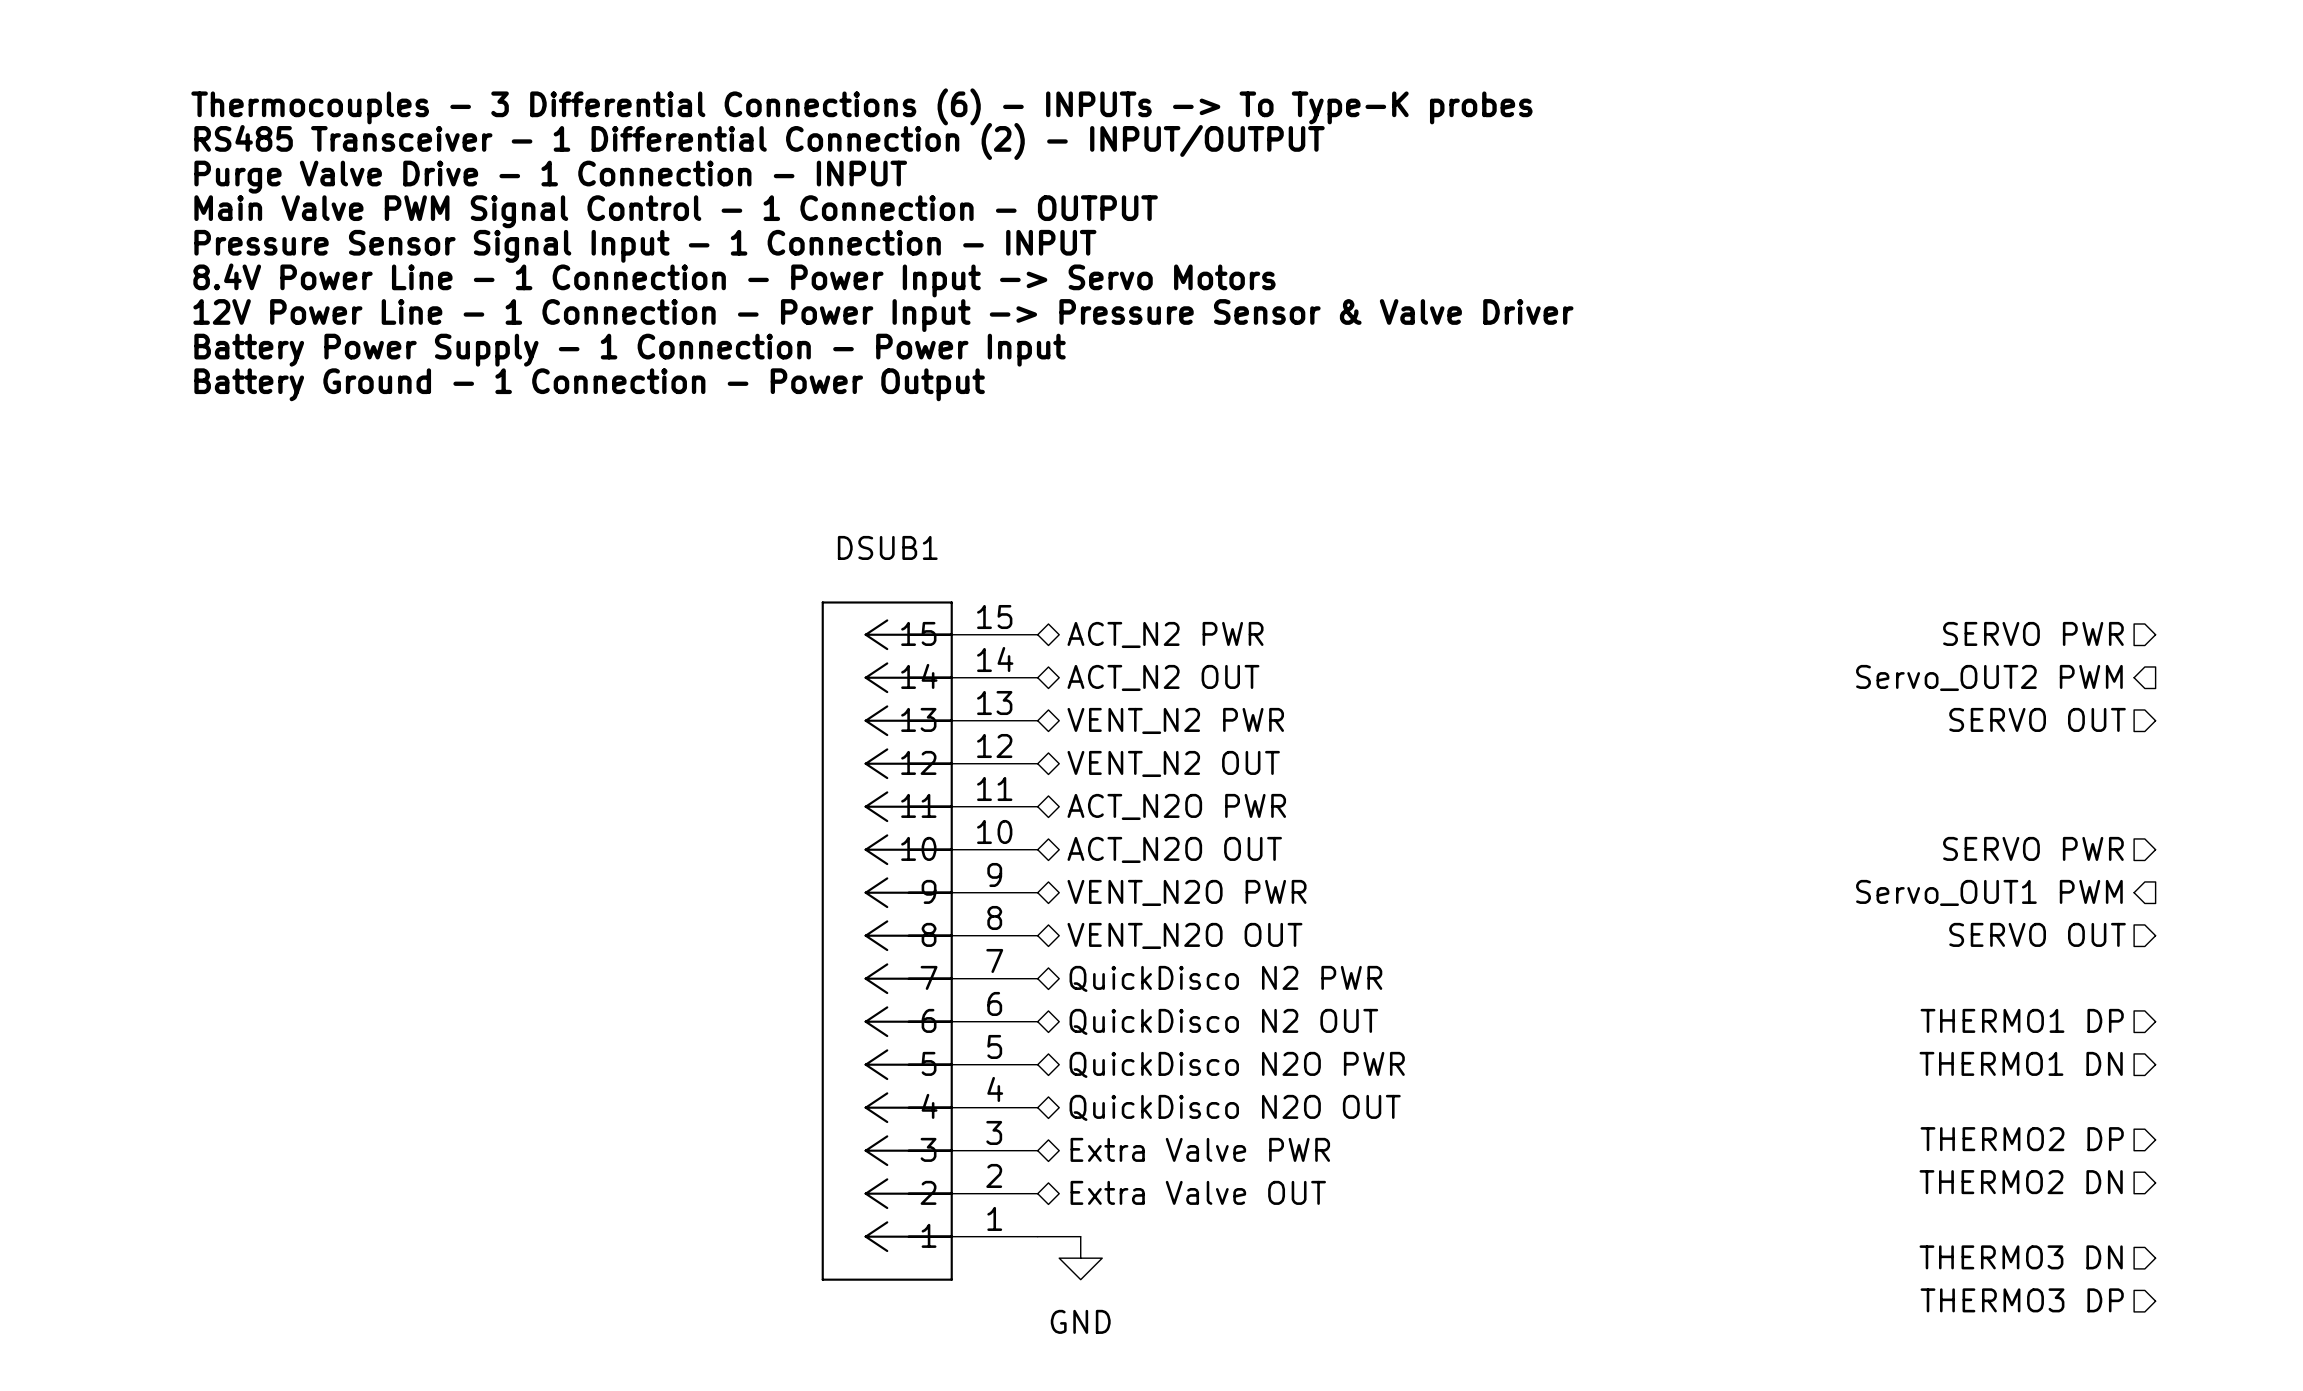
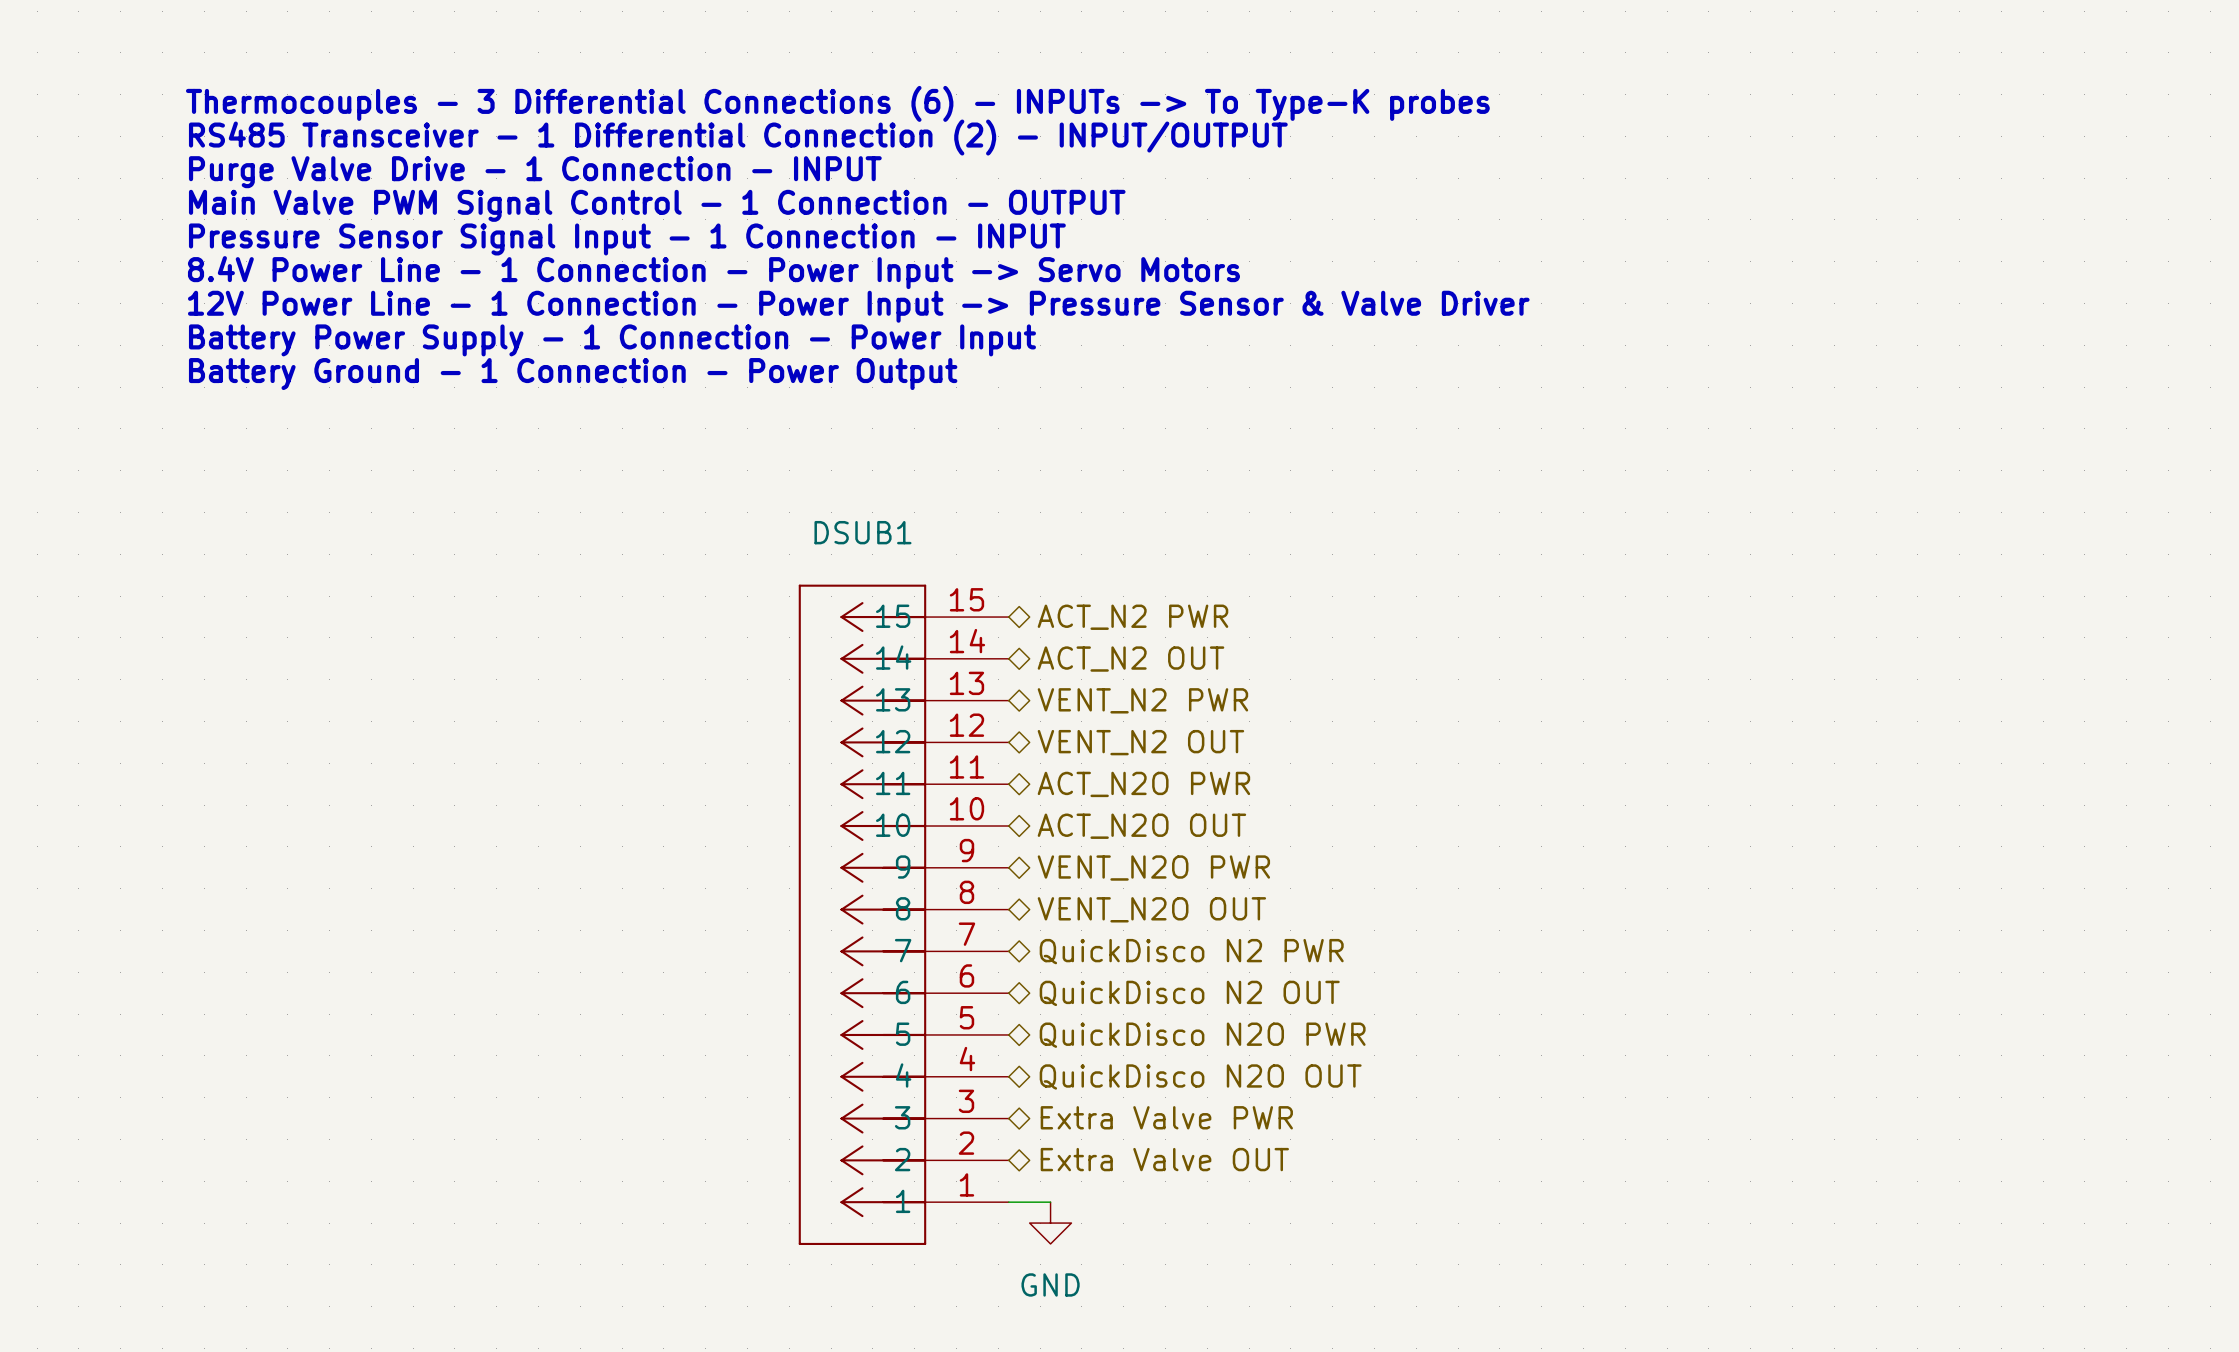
hierarchical label: SERVO PWR (2033, 633) -> none
hierarchical label: Servo_OUT2 PWM (1989, 677) -> none
hierarchical label: SERVO OUT (2037, 719) -> none
hierarchical label: SERVO PWR (2033, 848) -> none
hierarchical label: Servo_OUT1 PWM (1989, 892) -> none
hierarchical label: SERVO OUT (2037, 934) -> none
hierarchical label: THERMO1 DP (2022, 1020) -> none
hierarchical label: THERMO1 DN (2021, 1063) -> none
hierarchical label: THERMO2 DP (2022, 1139) -> none
hierarchical label: THERMO2 DN (2021, 1182) -> none
hierarchical label: THERMO3 DN (2021, 1257) -> none
hierarchical label: THERMO3 DP (2022, 1300) -> none

